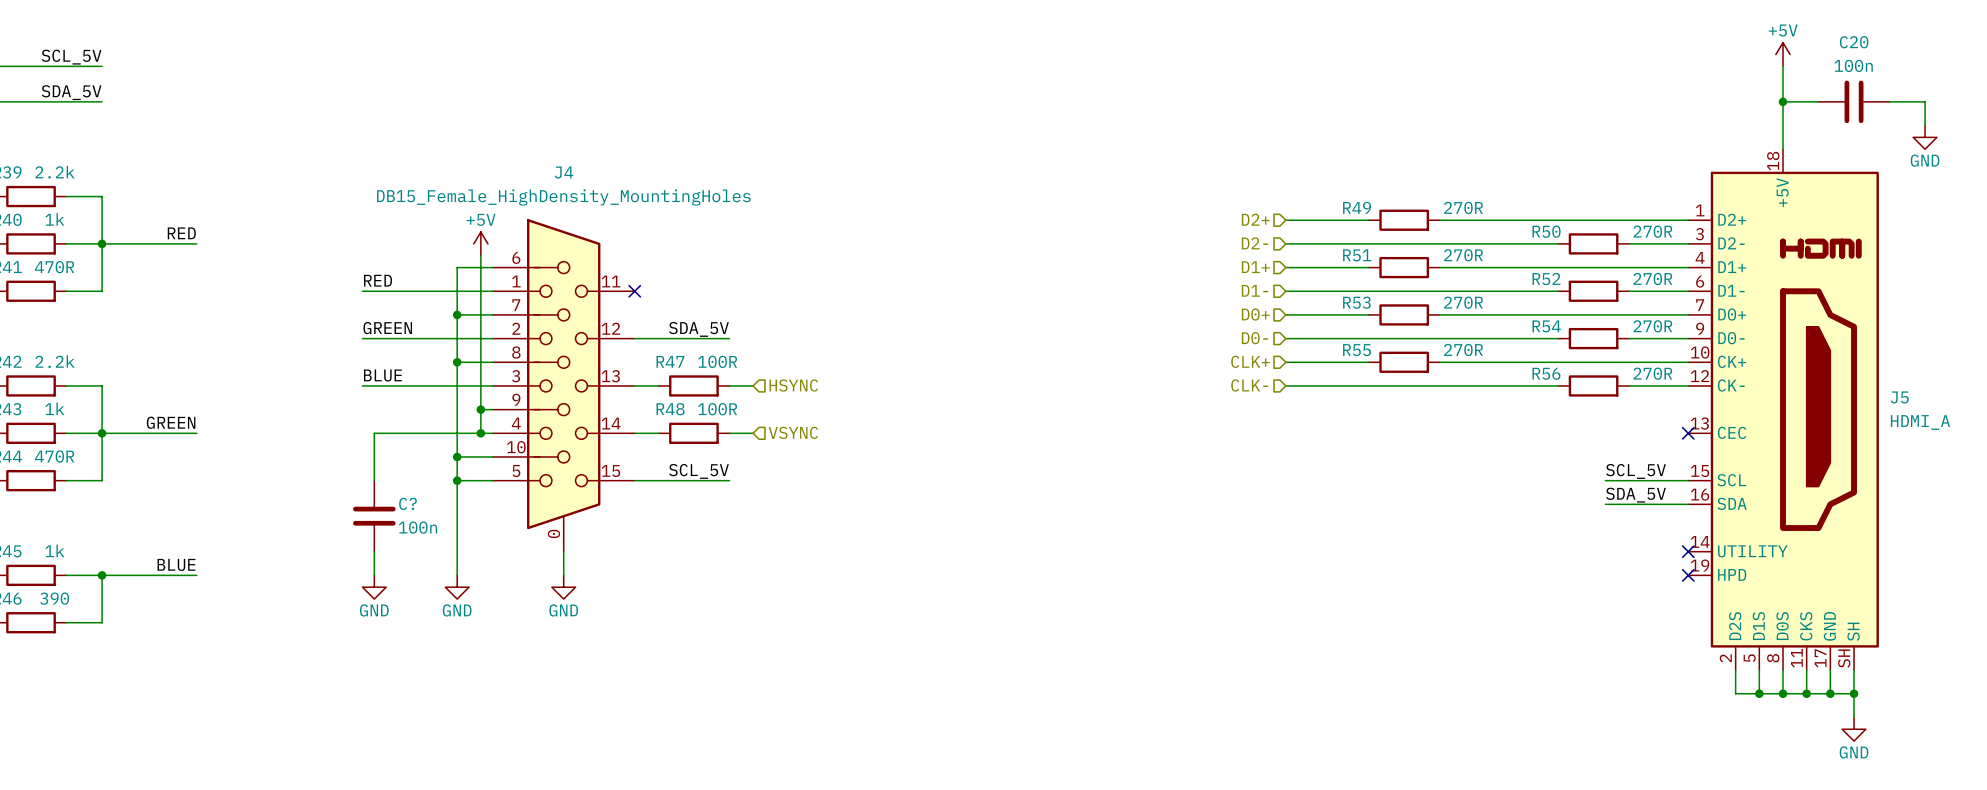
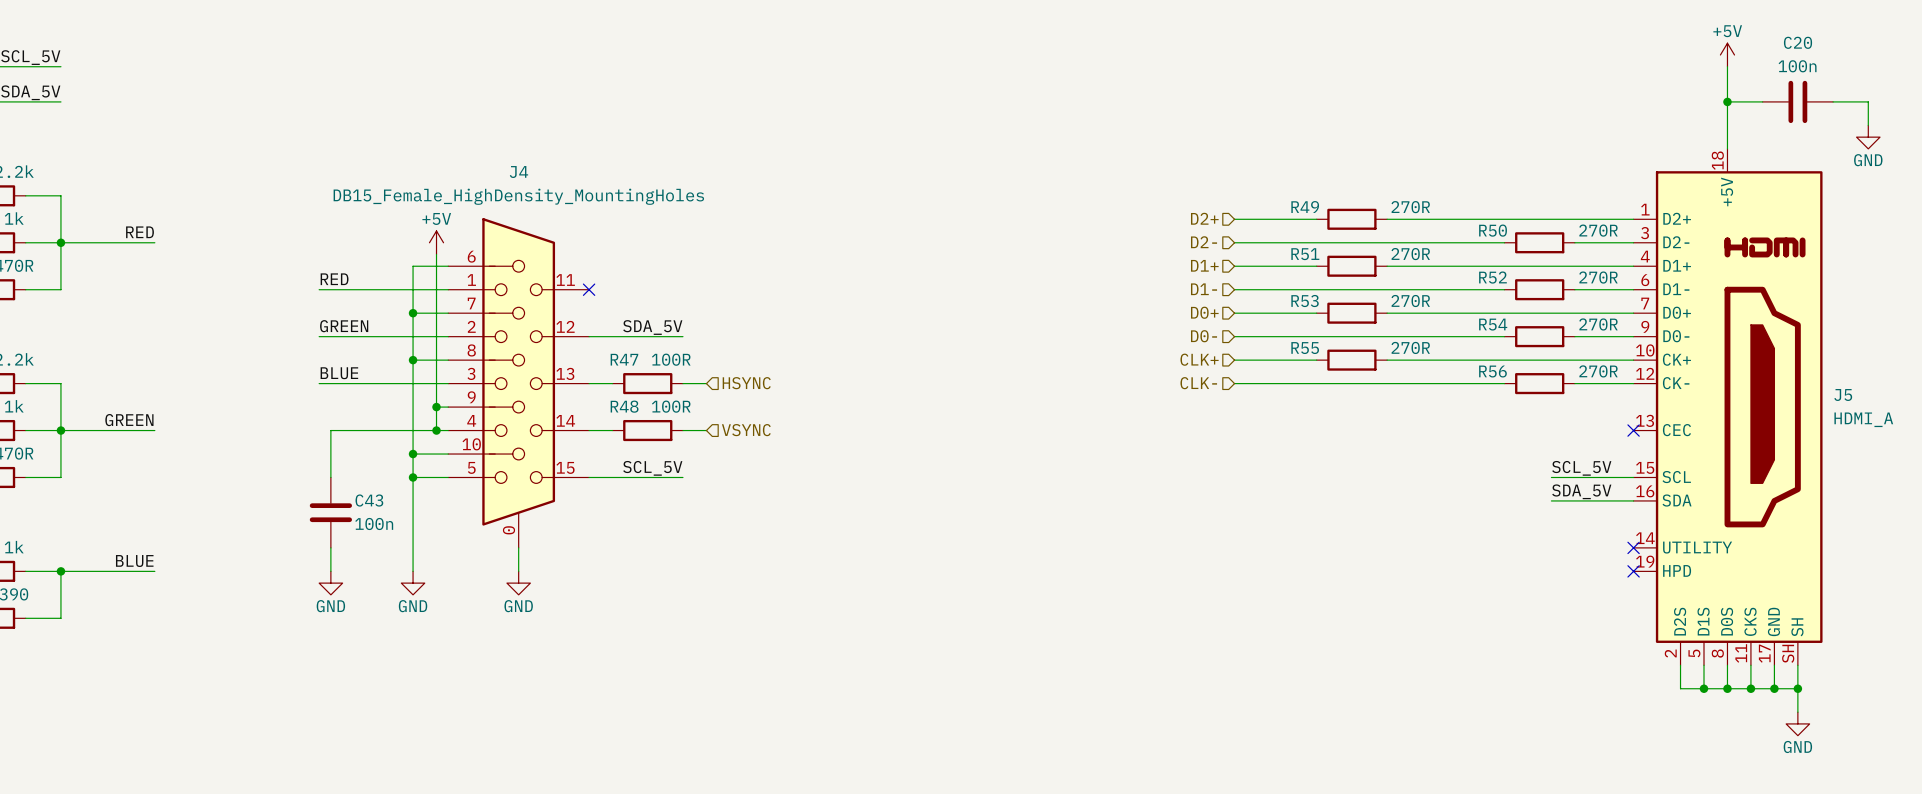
C? name: C? (408, 503) -> C43 (369, 500)

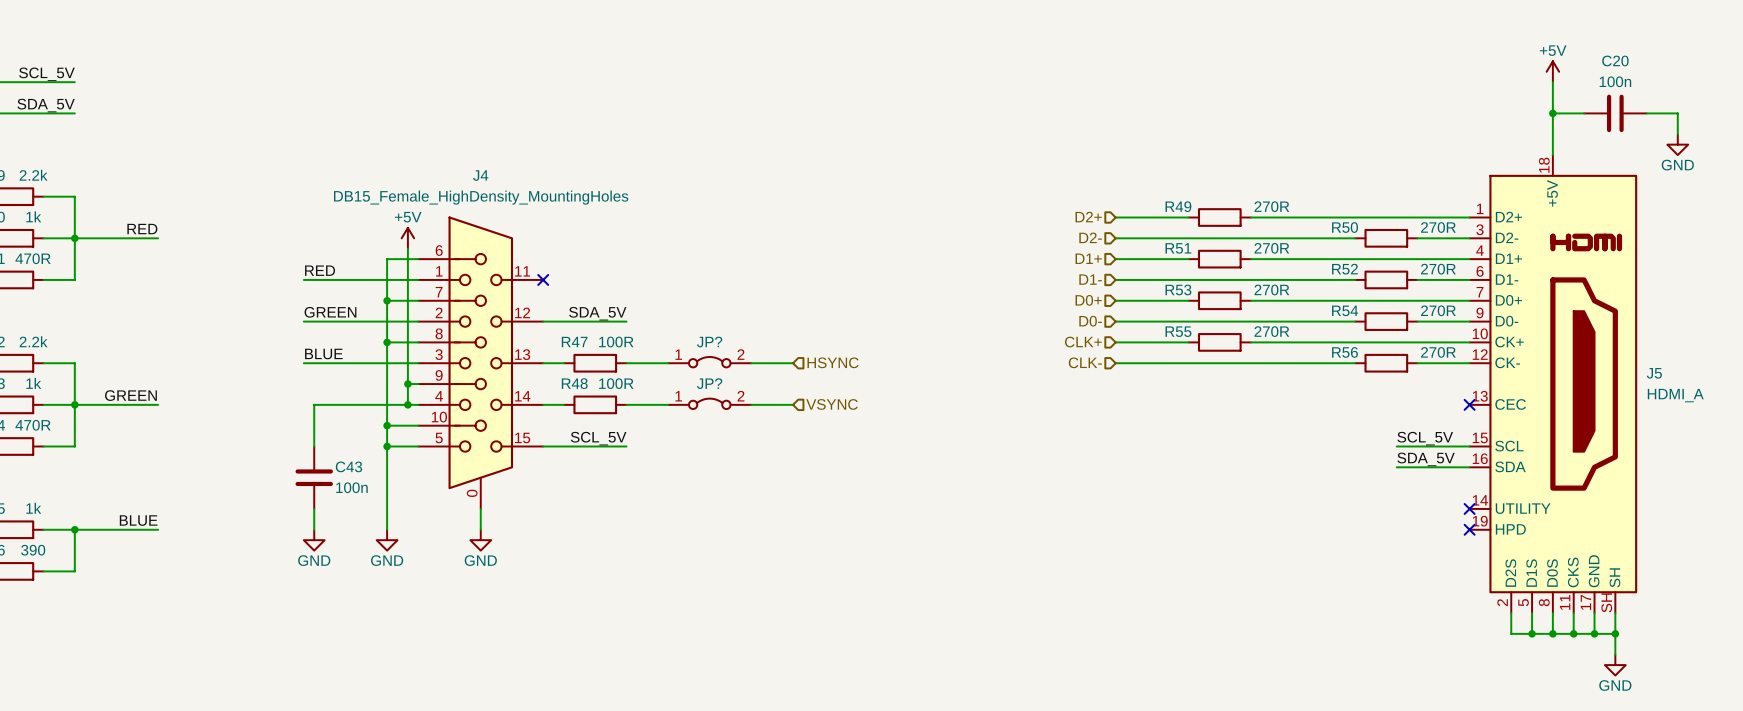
JP?: none -> (709, 362)
wire: none -> (647, 363) (668, 363)
hierarchical label position: HSYNC (746, 383) -> HSYNC (833, 362)
wire: none -> (751, 363) (793, 363)
JP?: none -> (709, 403)
wire: none -> (647, 404) (668, 404)
hierarchical label position: VSYNC (746, 430) -> VSYNC (832, 404)
wire: none -> (751, 404) (793, 404)

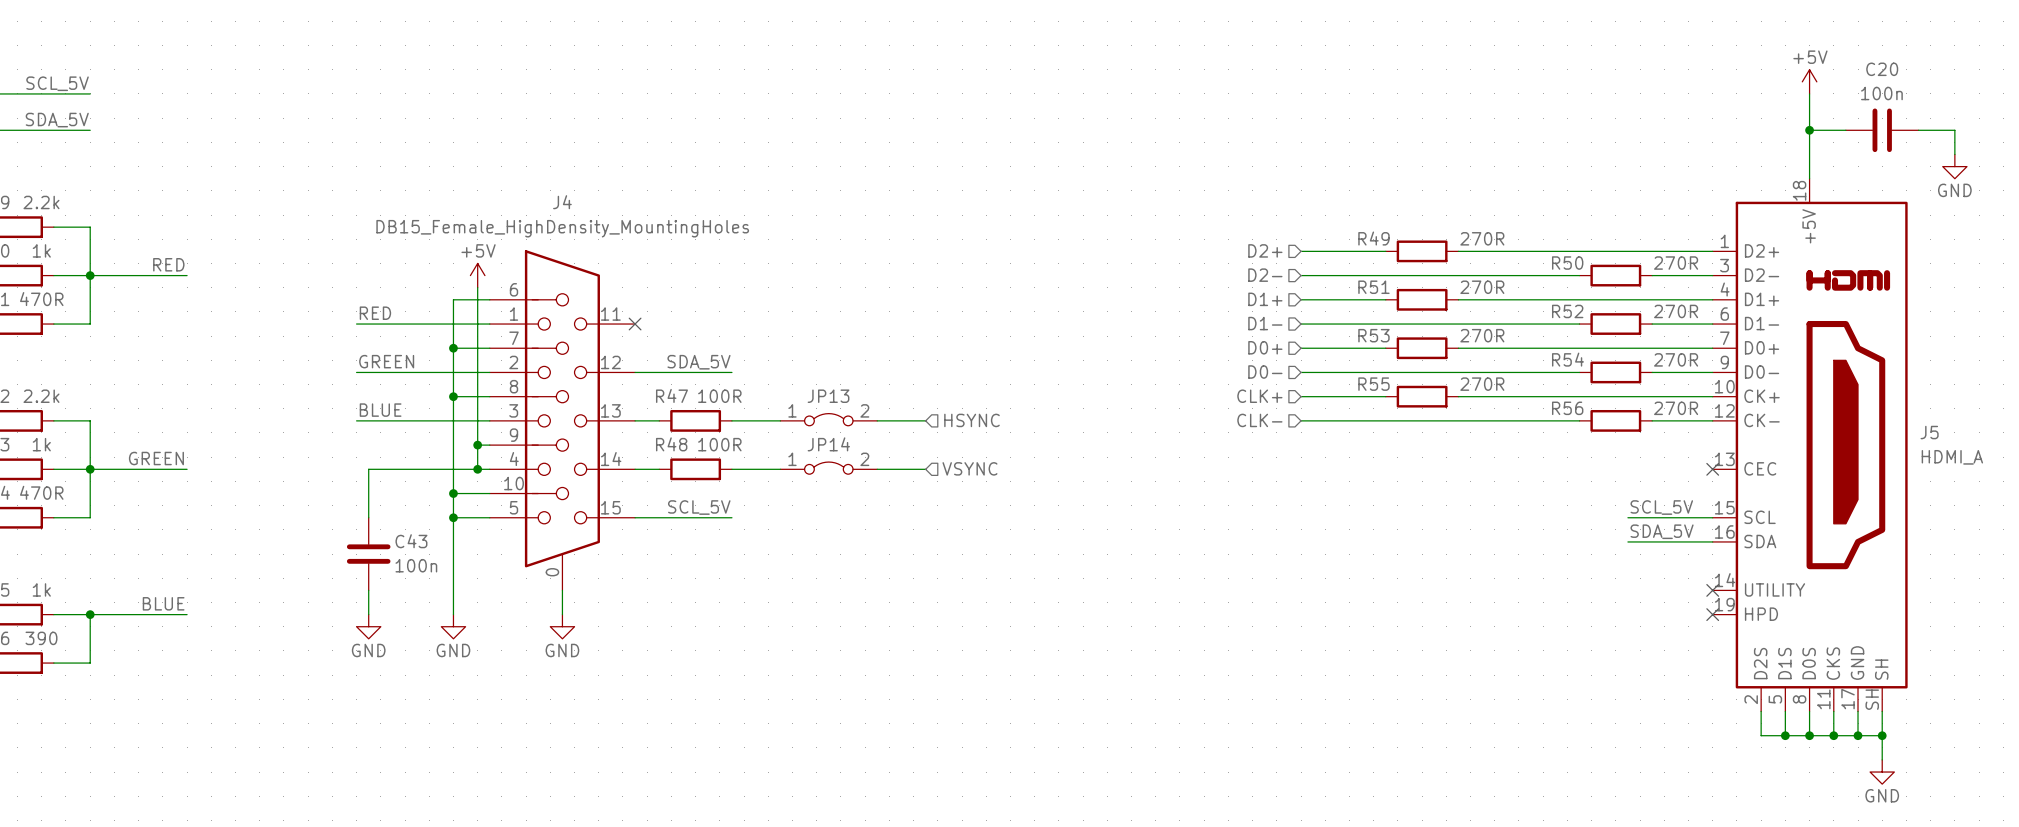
JP? name: JP? (709, 342) -> JP13 (828, 396)
JP? name: JP? (709, 383) -> JP14 (828, 444)

